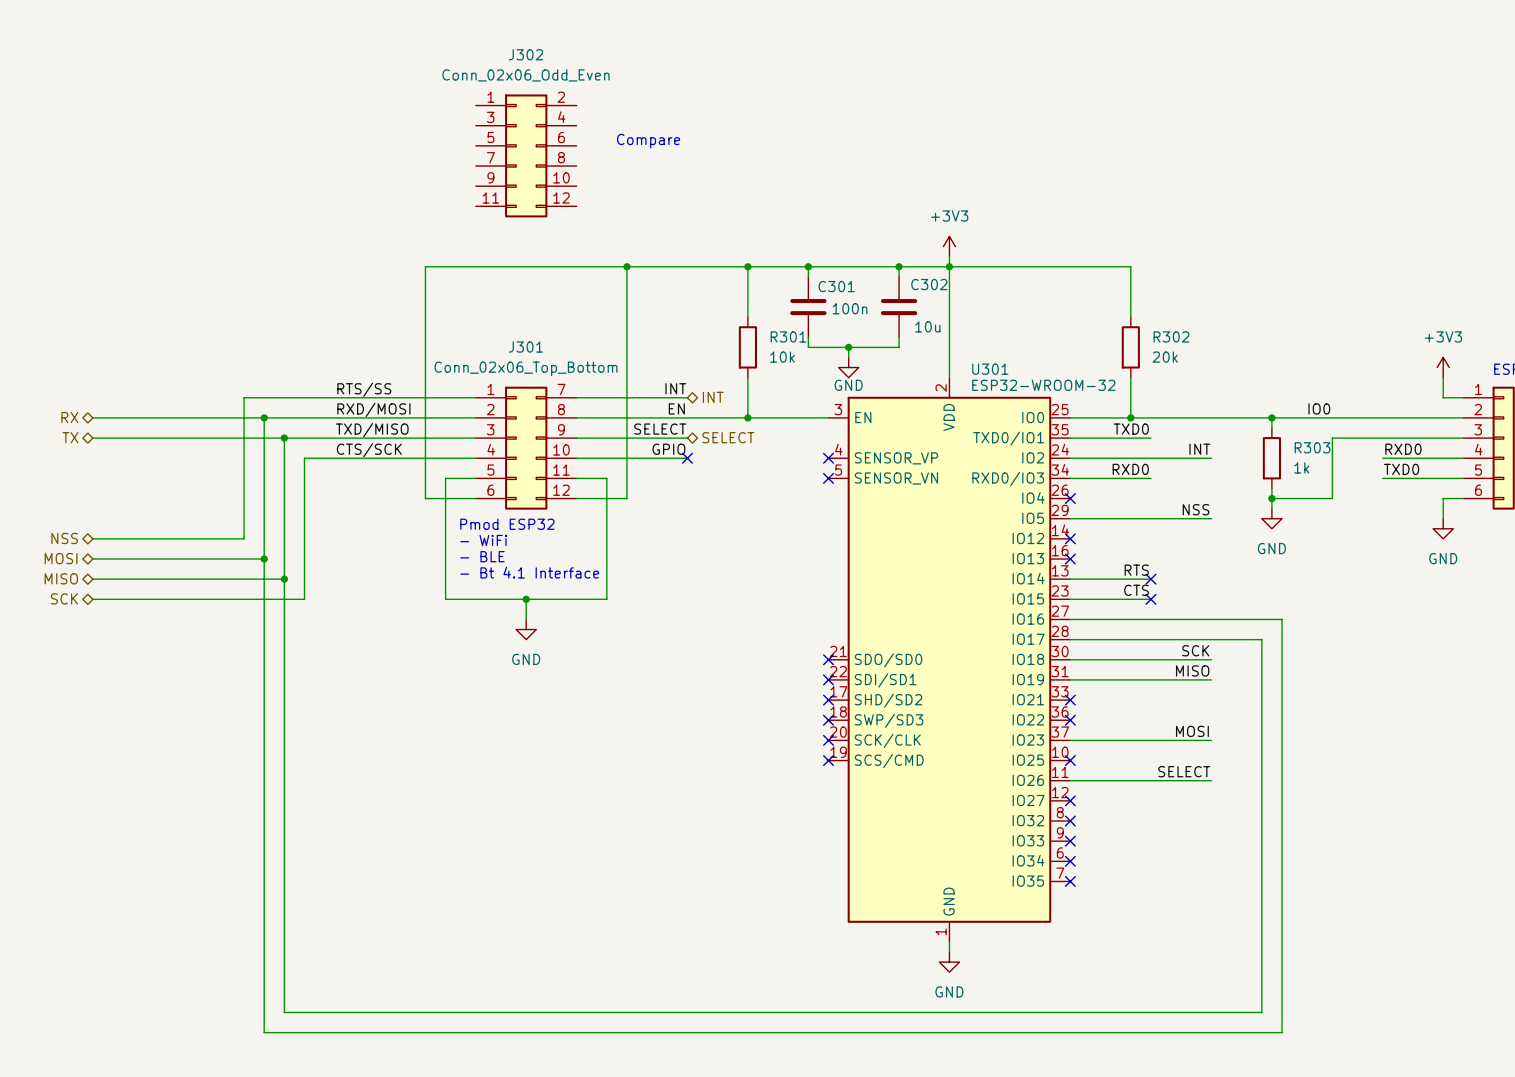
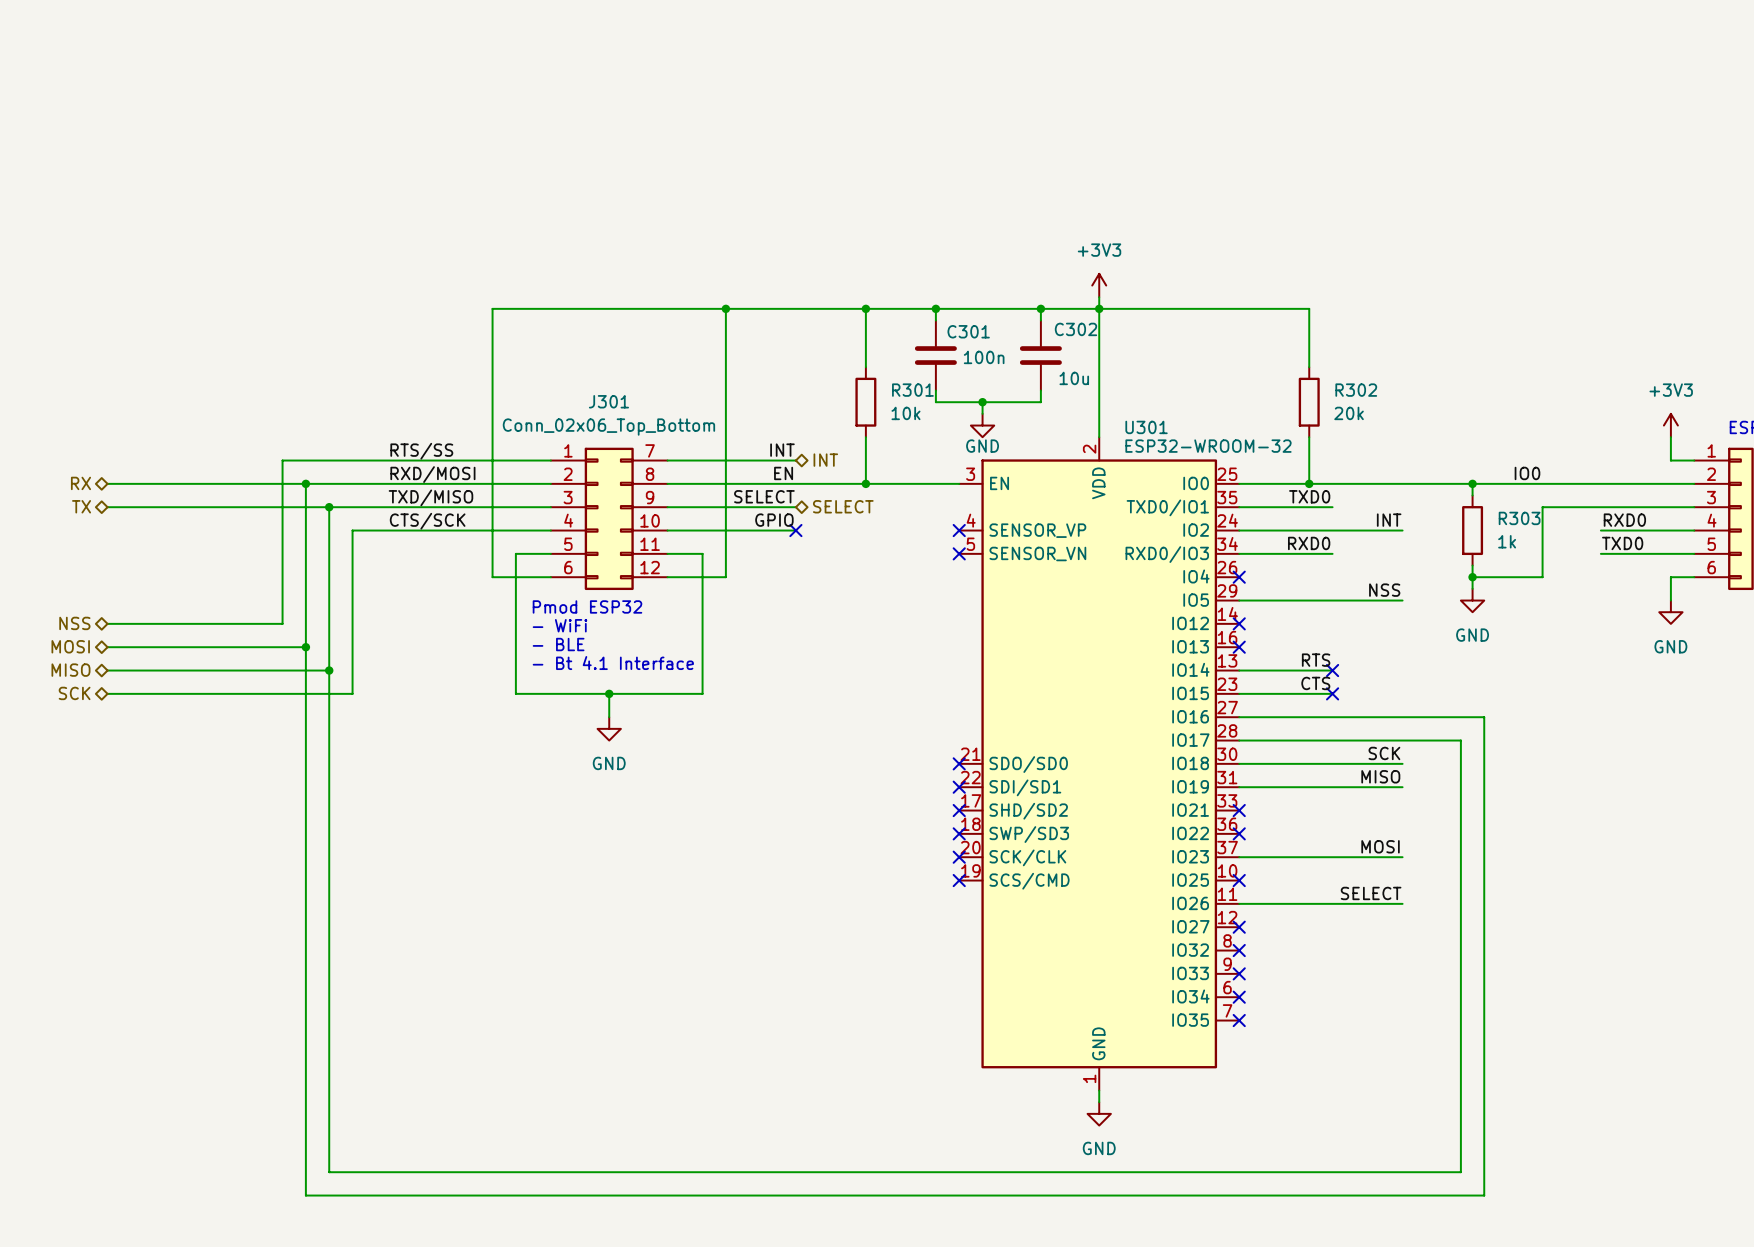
text: Compare (648, 141) -> none
J302: Conn_02x06_Odd_Even (526, 155) -> none

